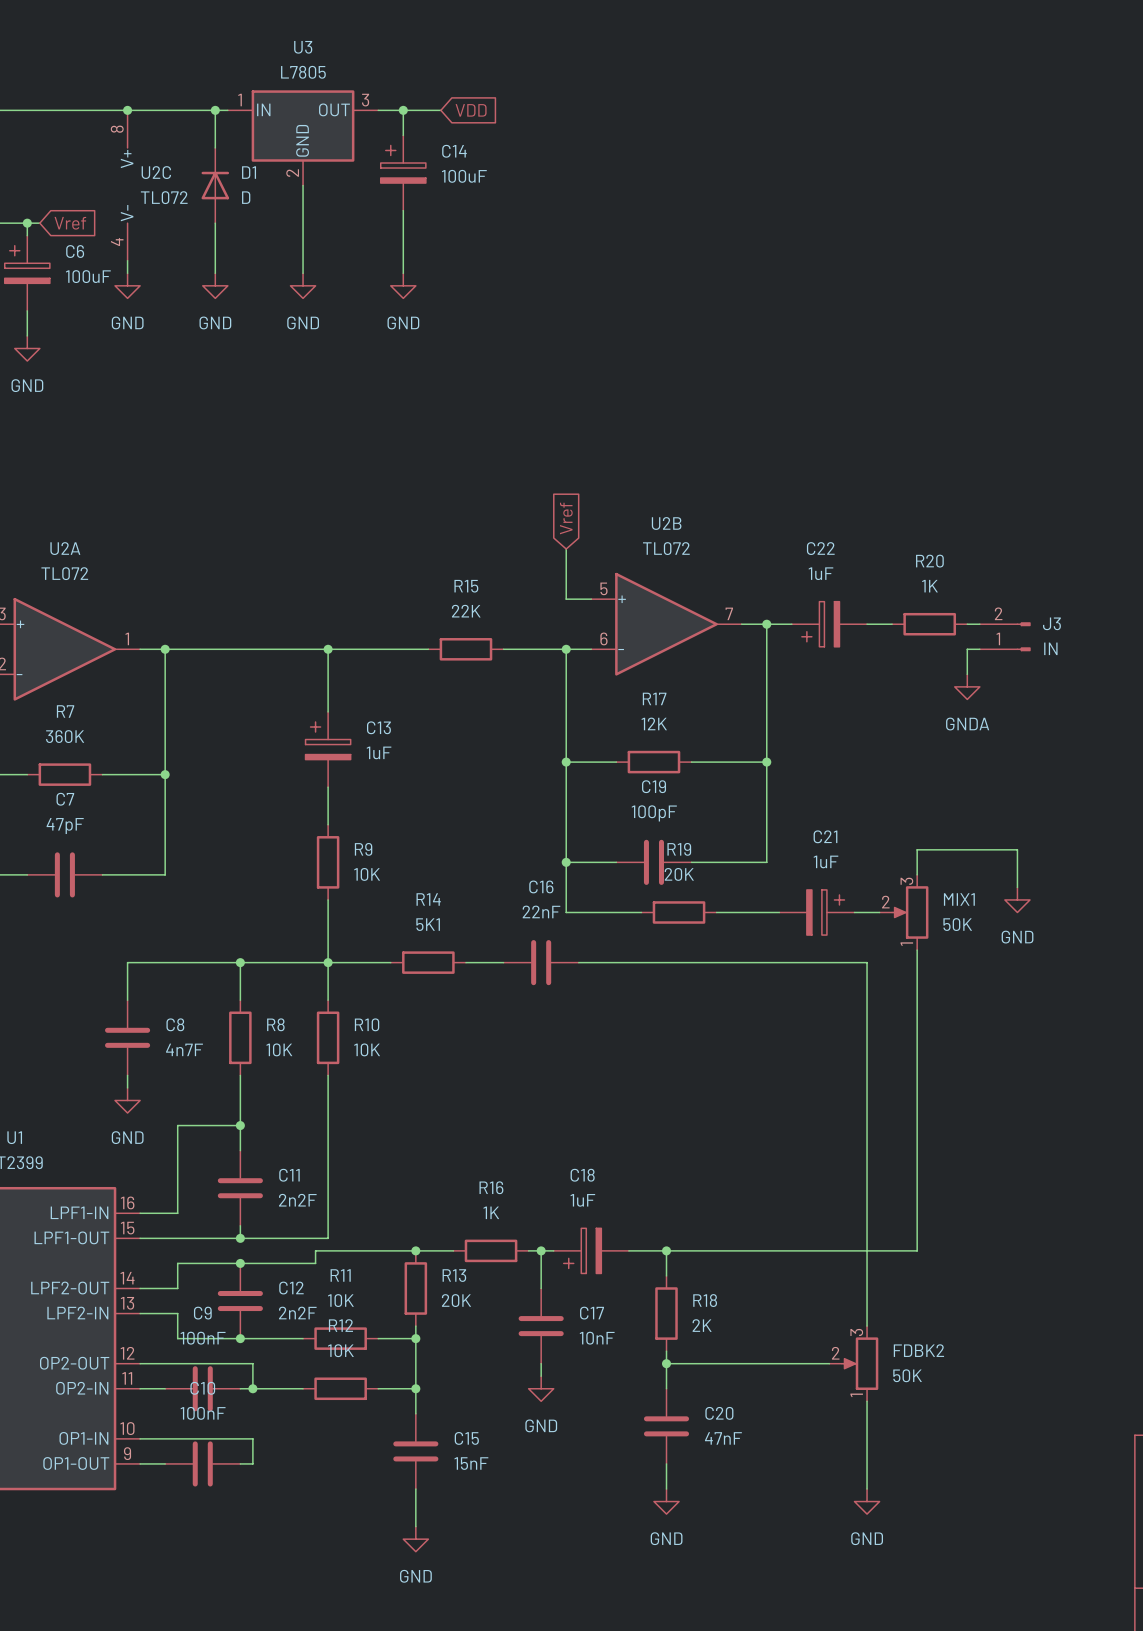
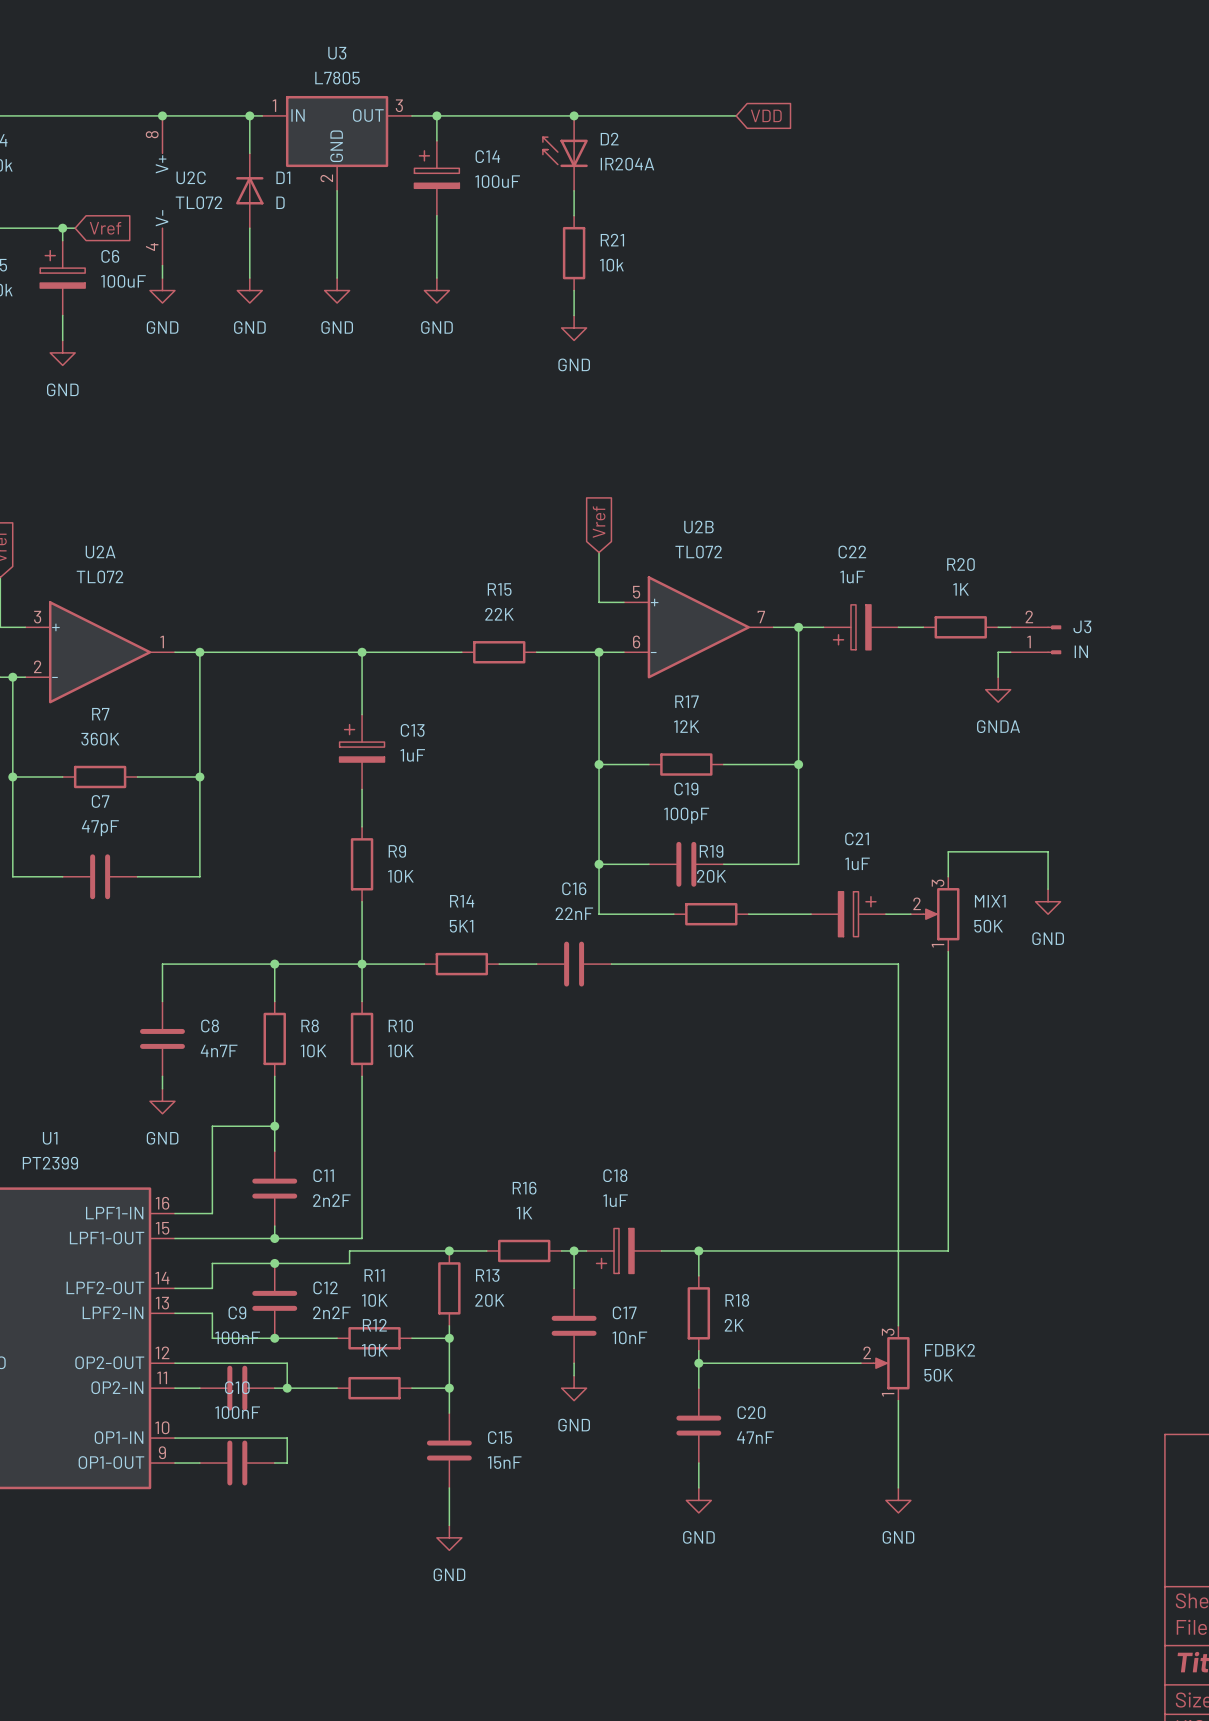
wire: none -> (474, 115) (736, 115)
global label: VDD (471, 110) -> none
junction: none -> (574, 115)
global label: none -> VDD (766, 115)
D2: none -> IR204A (565, 153)
wire: none -> (574, 190) (574, 215)
R21: none -> 10k (574, 253)
wire: none -> (574, 290) (574, 315)
power symbol: none -> GND (574, 327)

